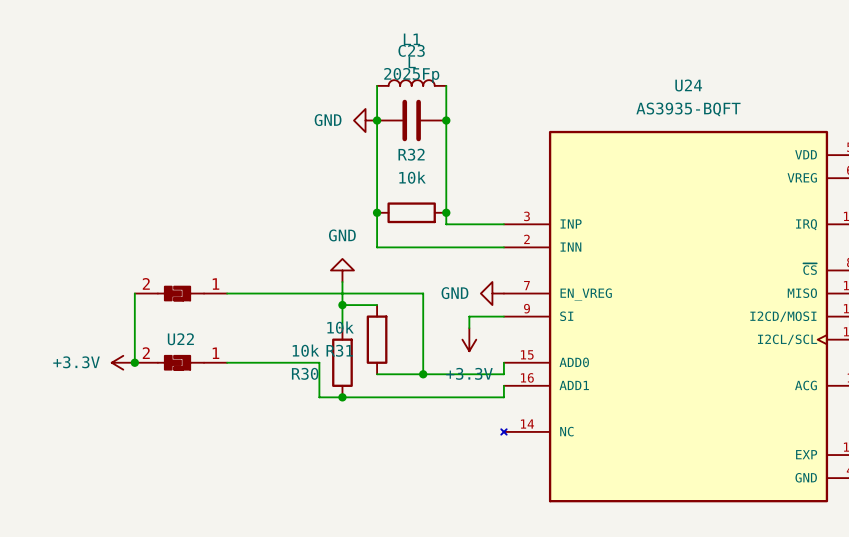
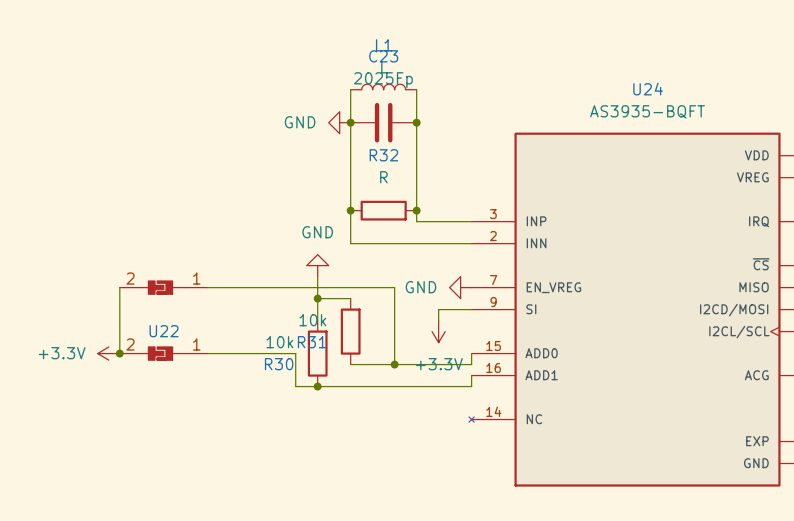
R32 value: 10k (412, 177) -> R (383, 177)

